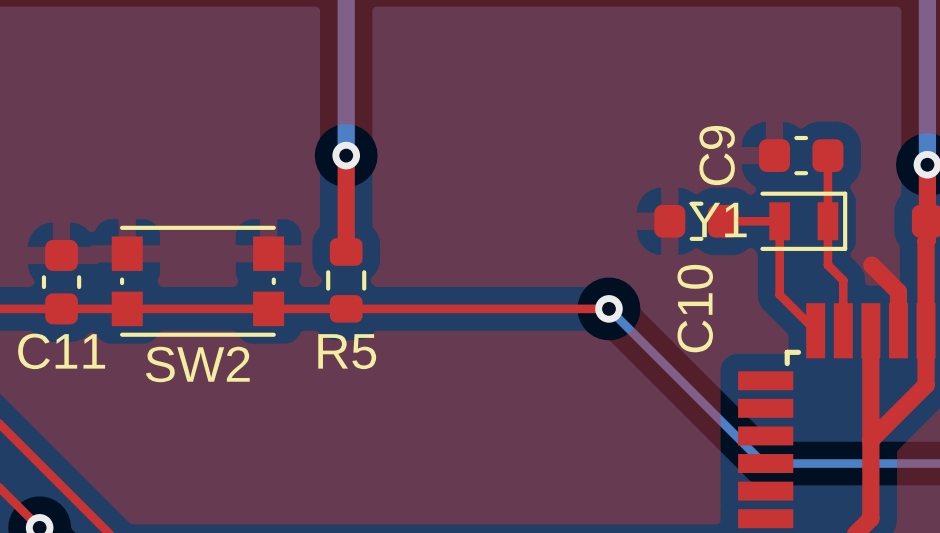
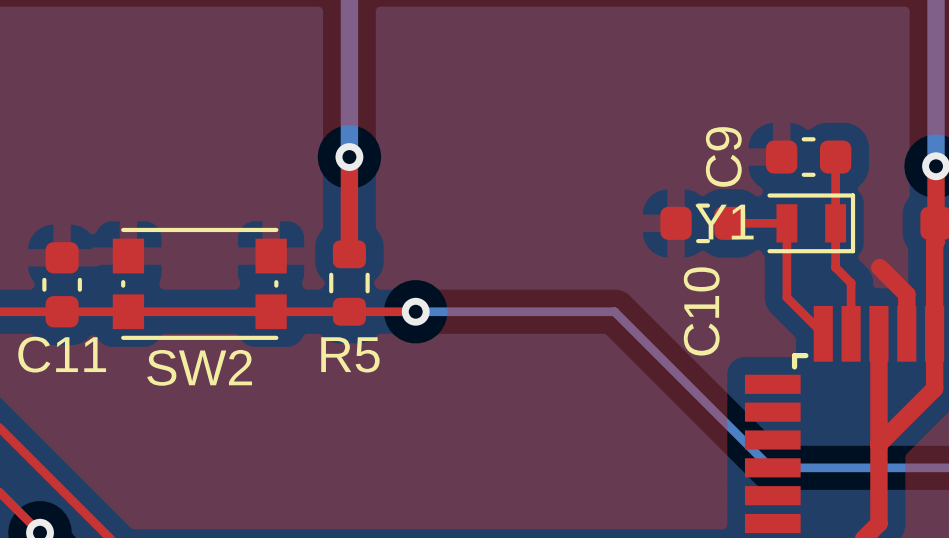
top track: (411, 308) (608, 308) -> none
bottom track: none -> (415, 311) (614, 311)
via position: (608, 308) -> (415, 311)

